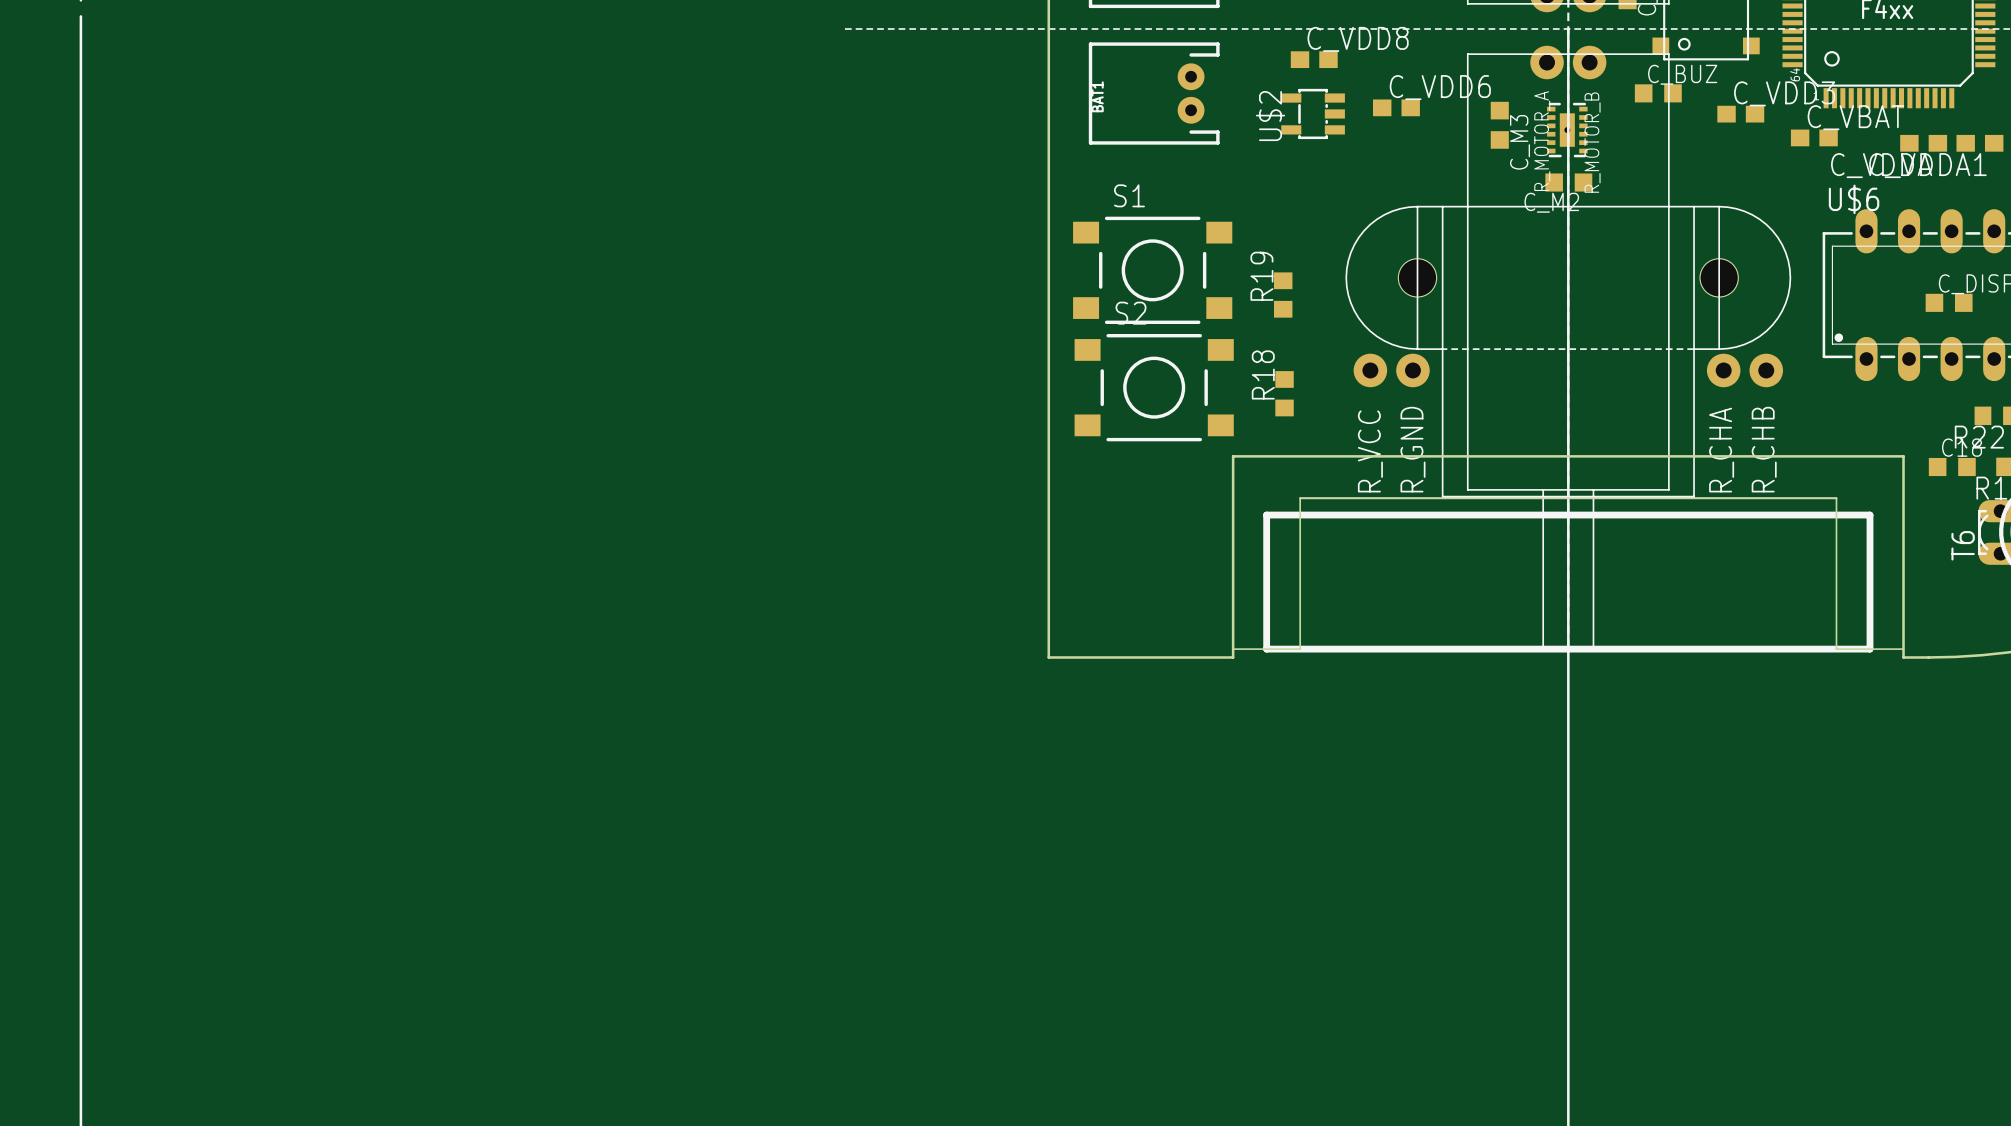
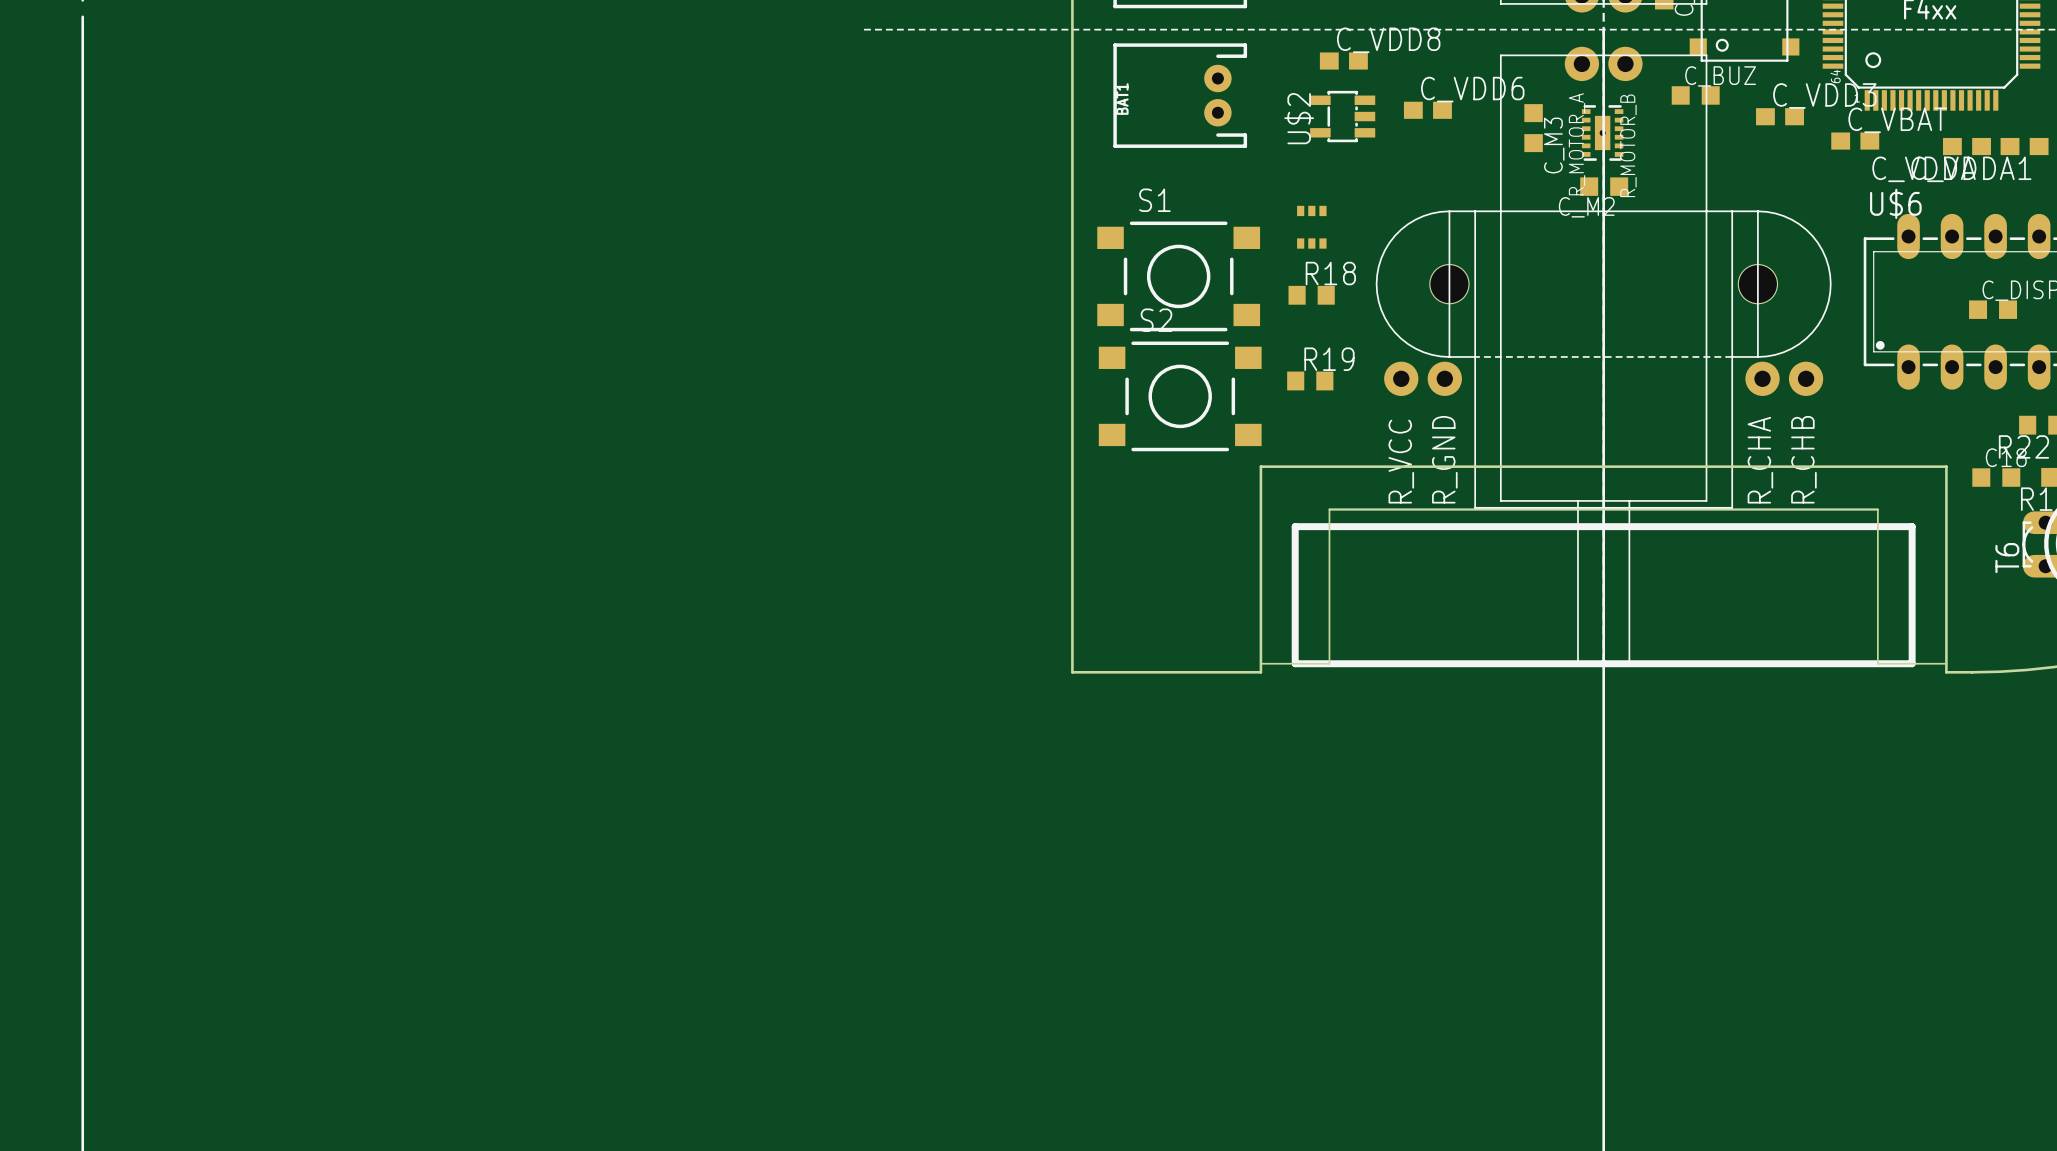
part: none -> (1311, 227)
R19 rotation: 0° (1283, 295) -> 90° clockwise (1310, 380)
R19 position: (1283, 295) -> (1310, 380)
R18 rotation: 0° (1284, 393) -> 90° clockwise (1311, 295)
R18 position: (1284, 393) -> (1311, 295)

